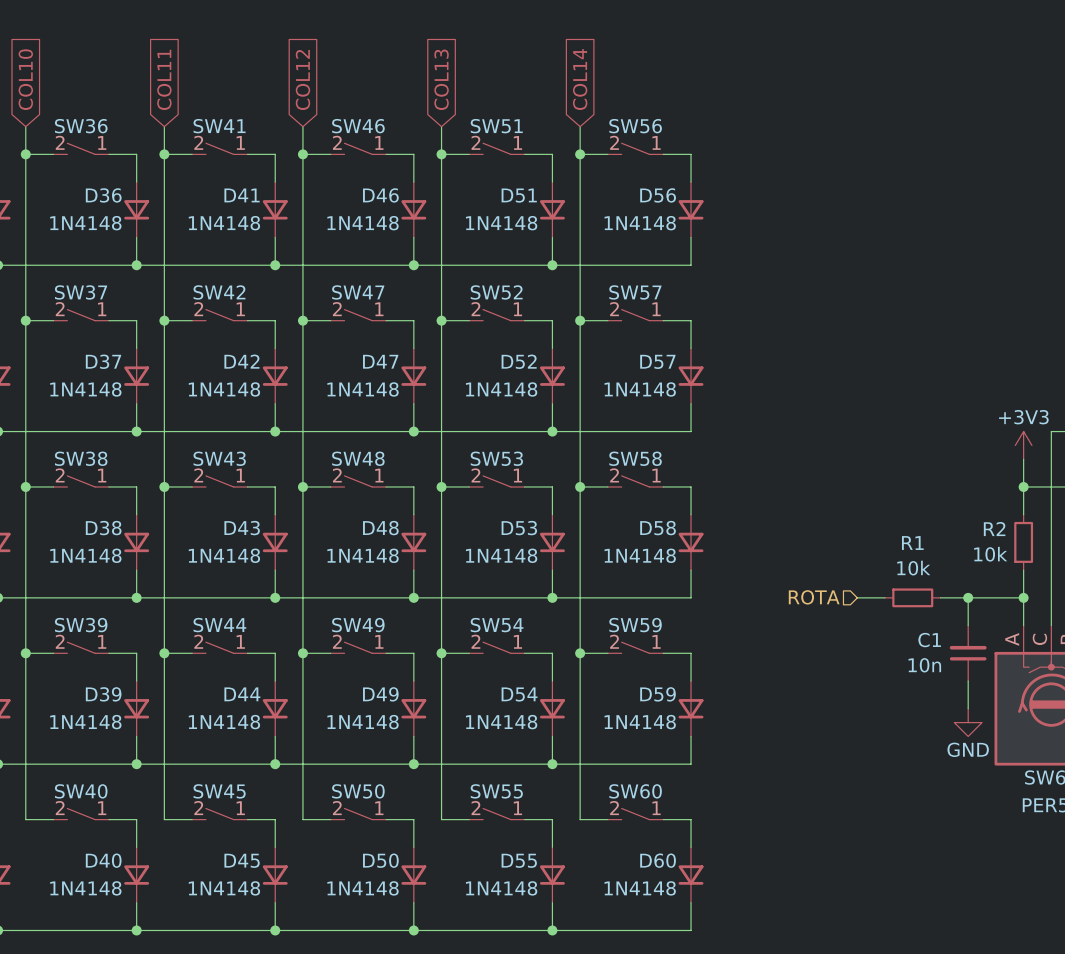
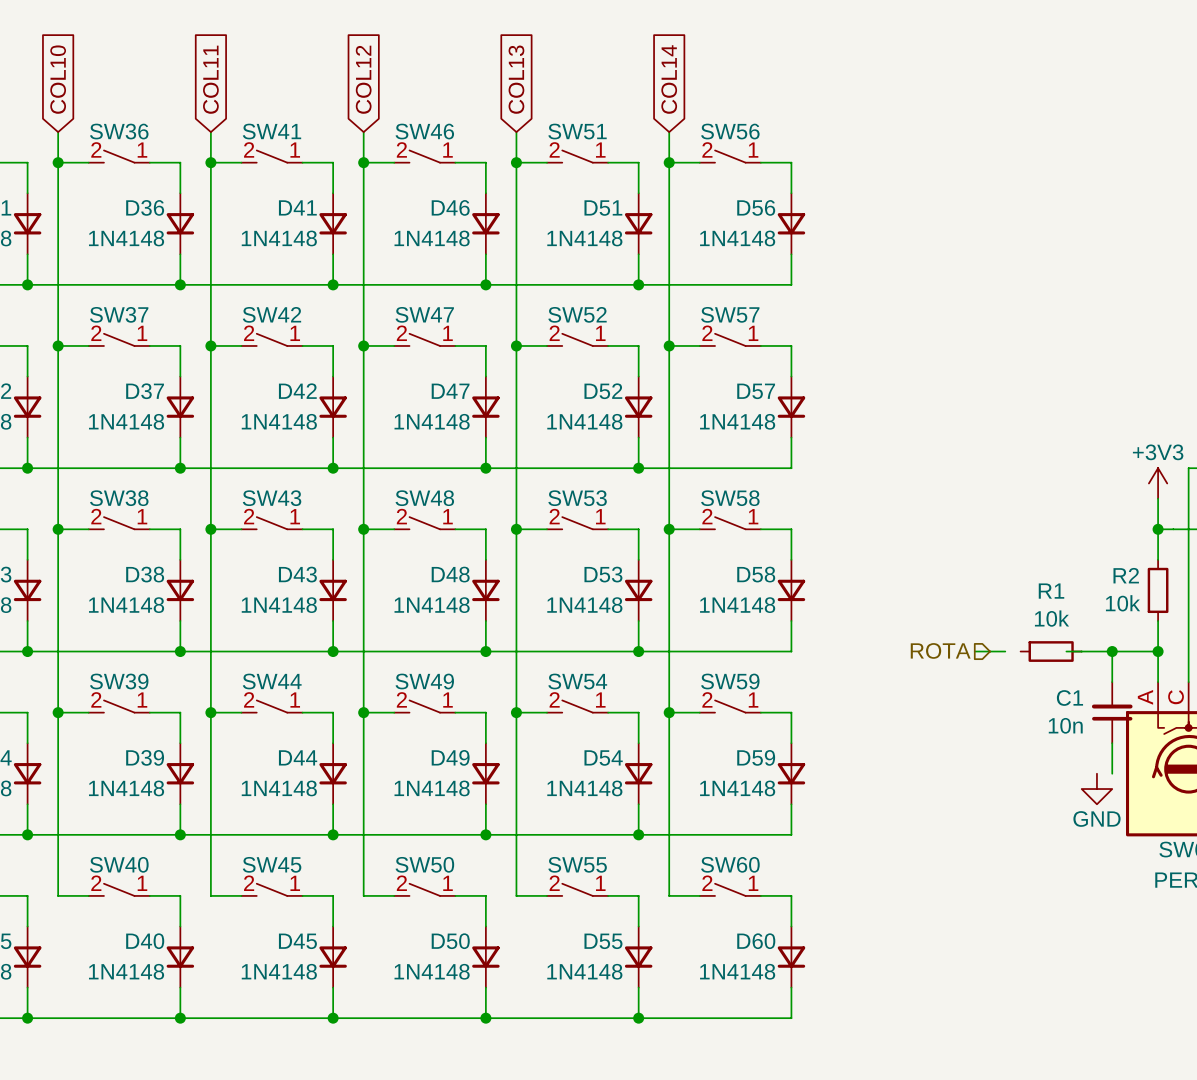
hierarchical label position: ROTA (814, 597) -> ROTA (940, 650)
R1 position: (912, 597) -> (1051, 651)
wire: (968, 597) (968, 625) -> (1112, 651) (1112, 682)
junction position: (968, 597) -> (1112, 651)
C1 position: (968, 653) -> (1112, 712)
wire: (968, 681) (968, 708) -> (1112, 743) (1112, 773)

